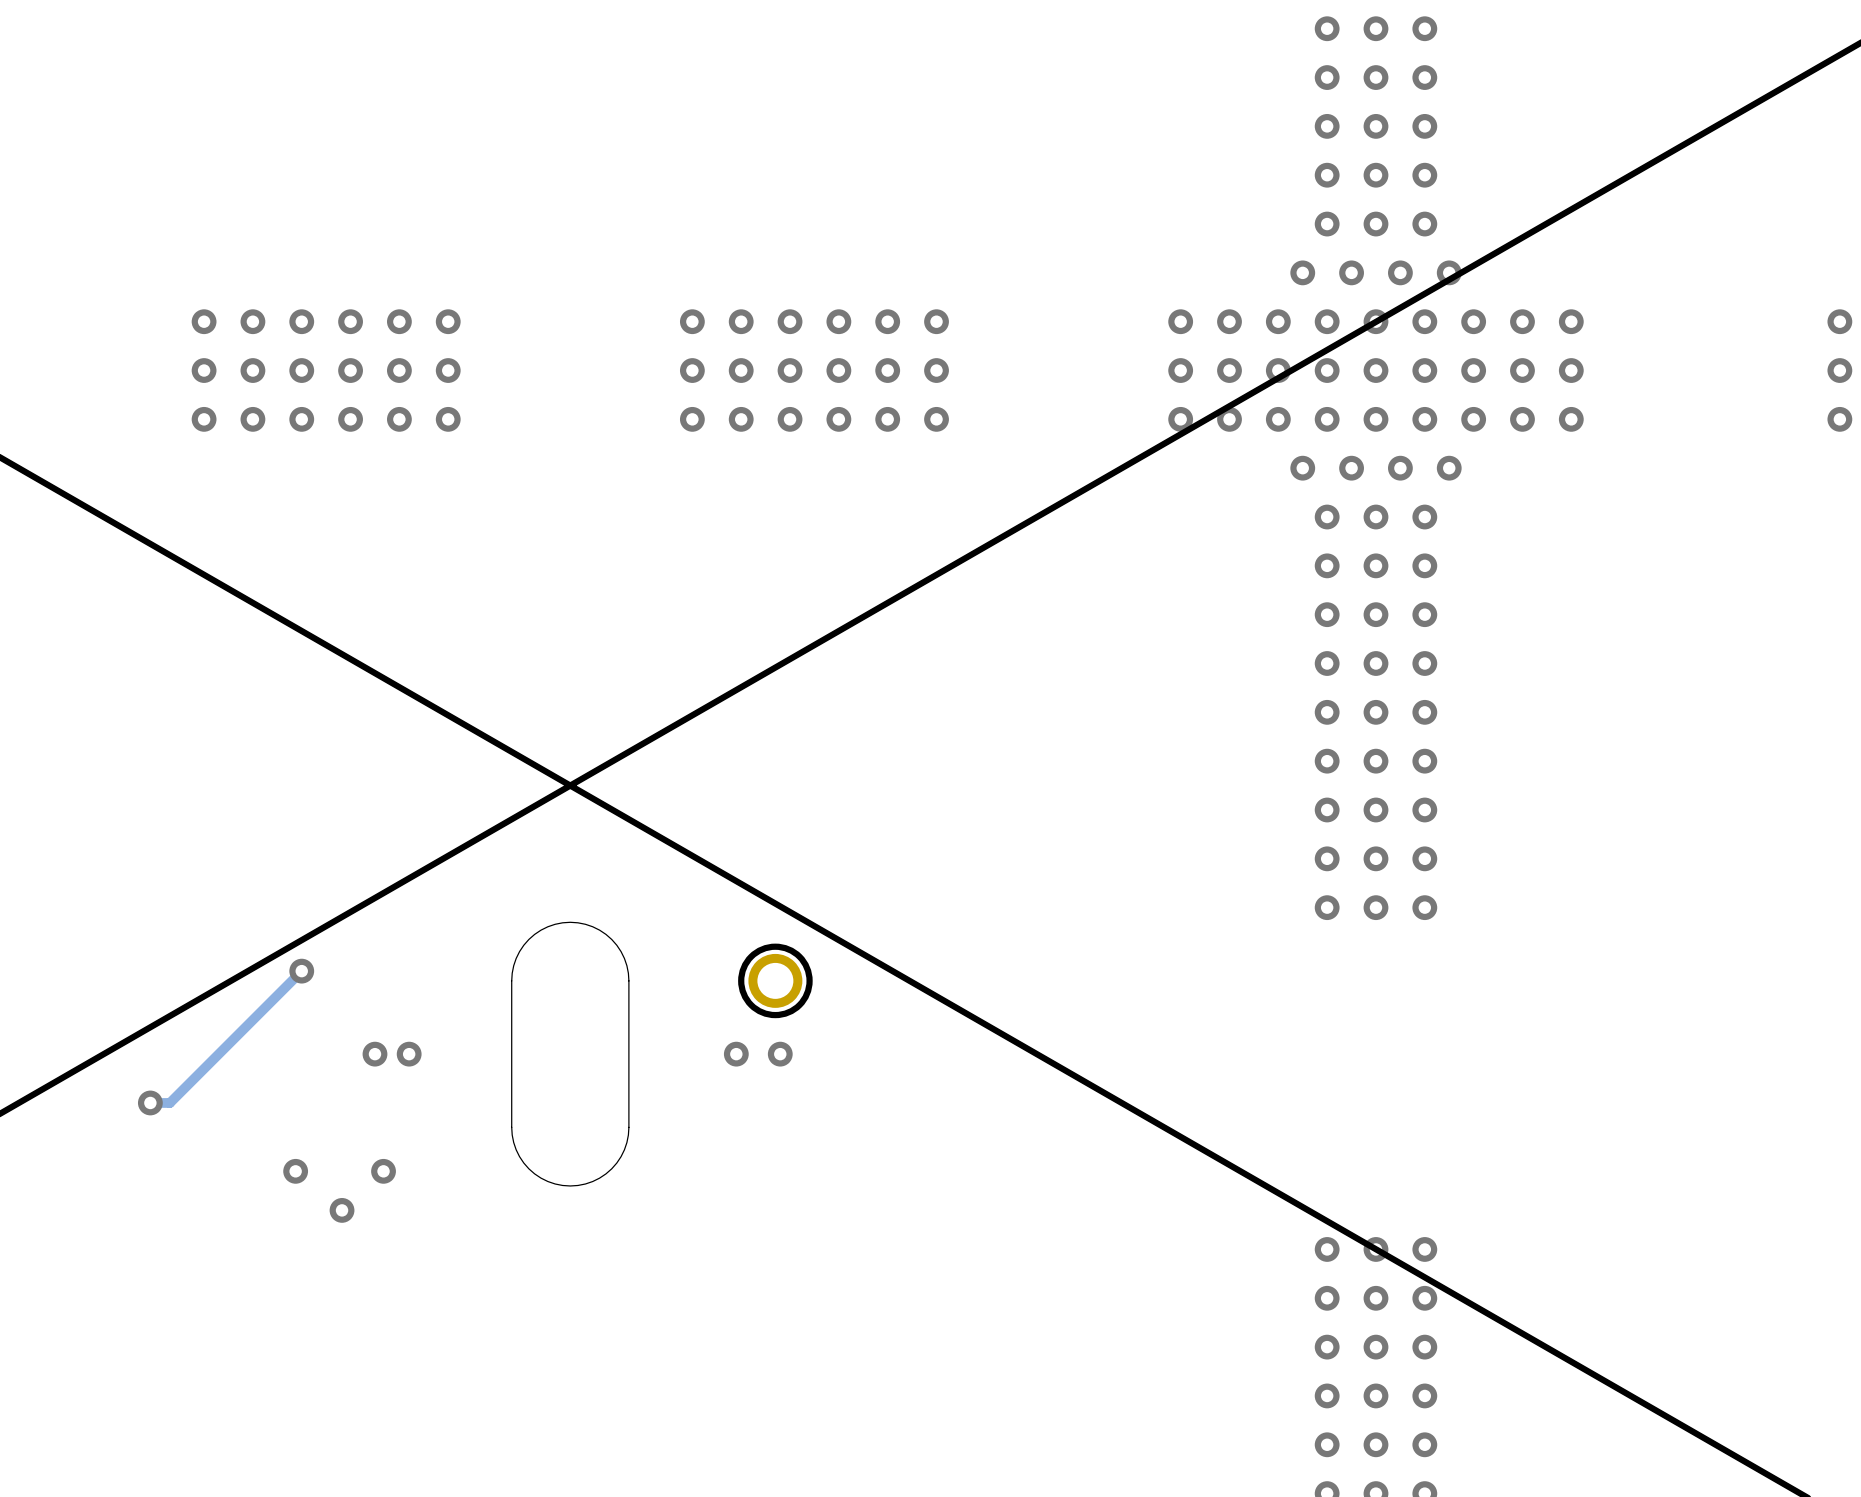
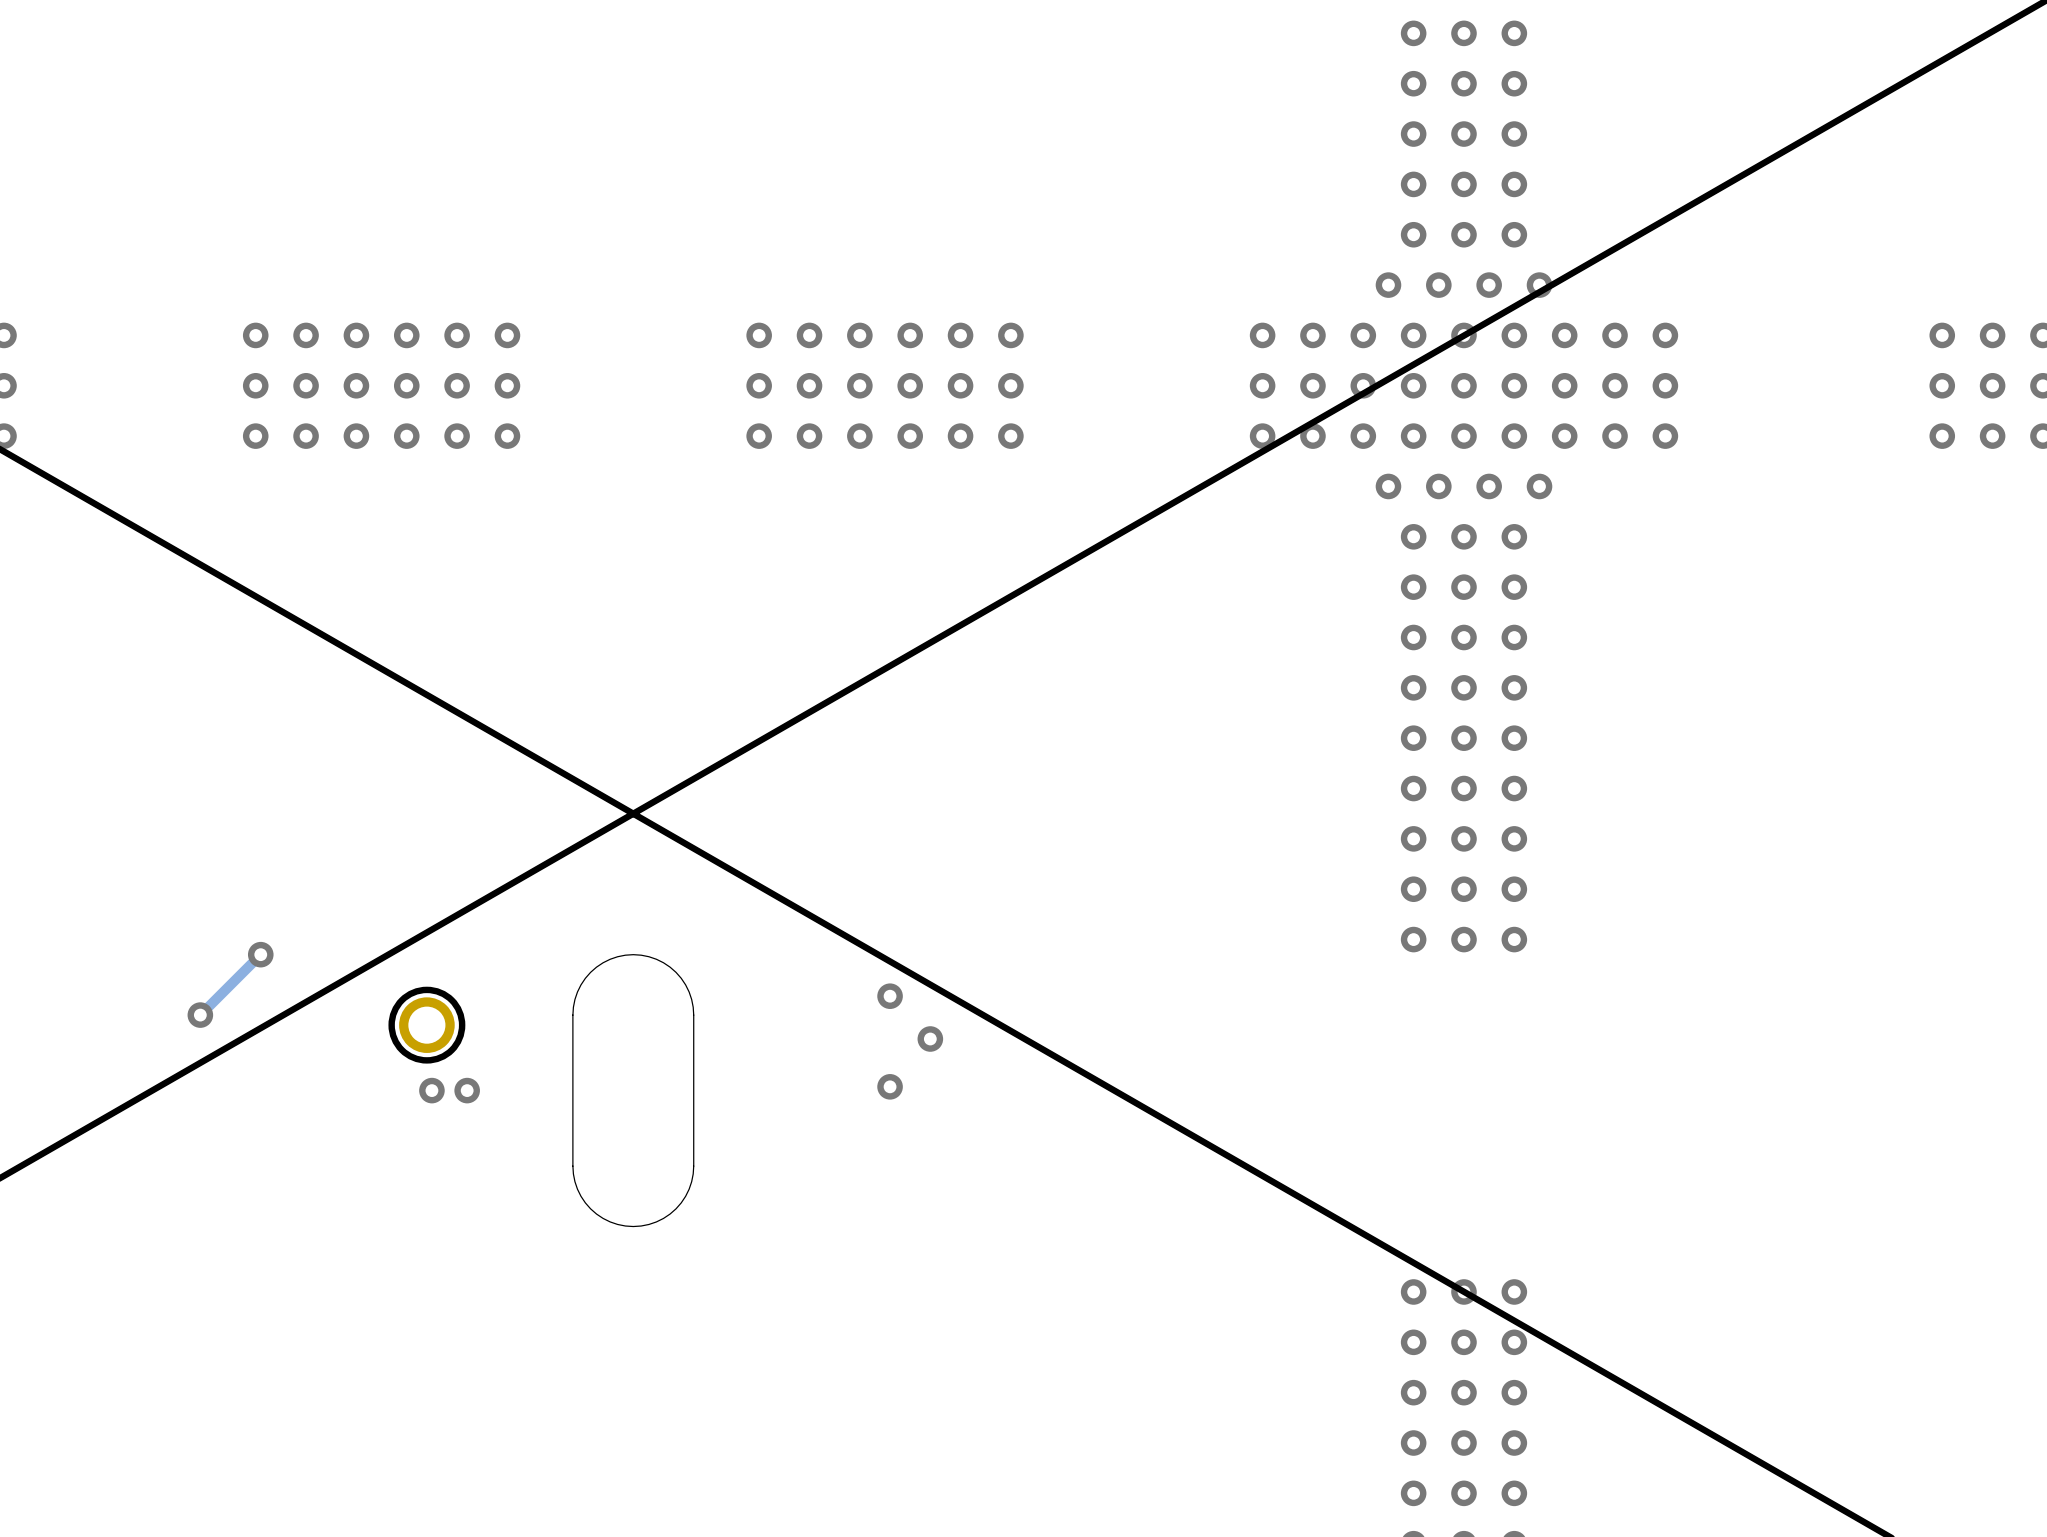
track: none -> (260, 954) (200, 1015)
via: none -> (260, 954)
via: none -> (890, 996)
track: (301, 971) (169, 1102) (150, 1102) -> none
via: (301, 971) -> none
via: none -> (200, 1015)
part position: (775, 980) -> (426, 1025)
via: none -> (930, 1038)
via: (736, 1054) -> none
via position: (780, 1054) -> (890, 1086)
via: (150, 1102) -> none
via: (295, 1171) -> none
via: (383, 1171) -> none
via: (342, 1210) -> none

